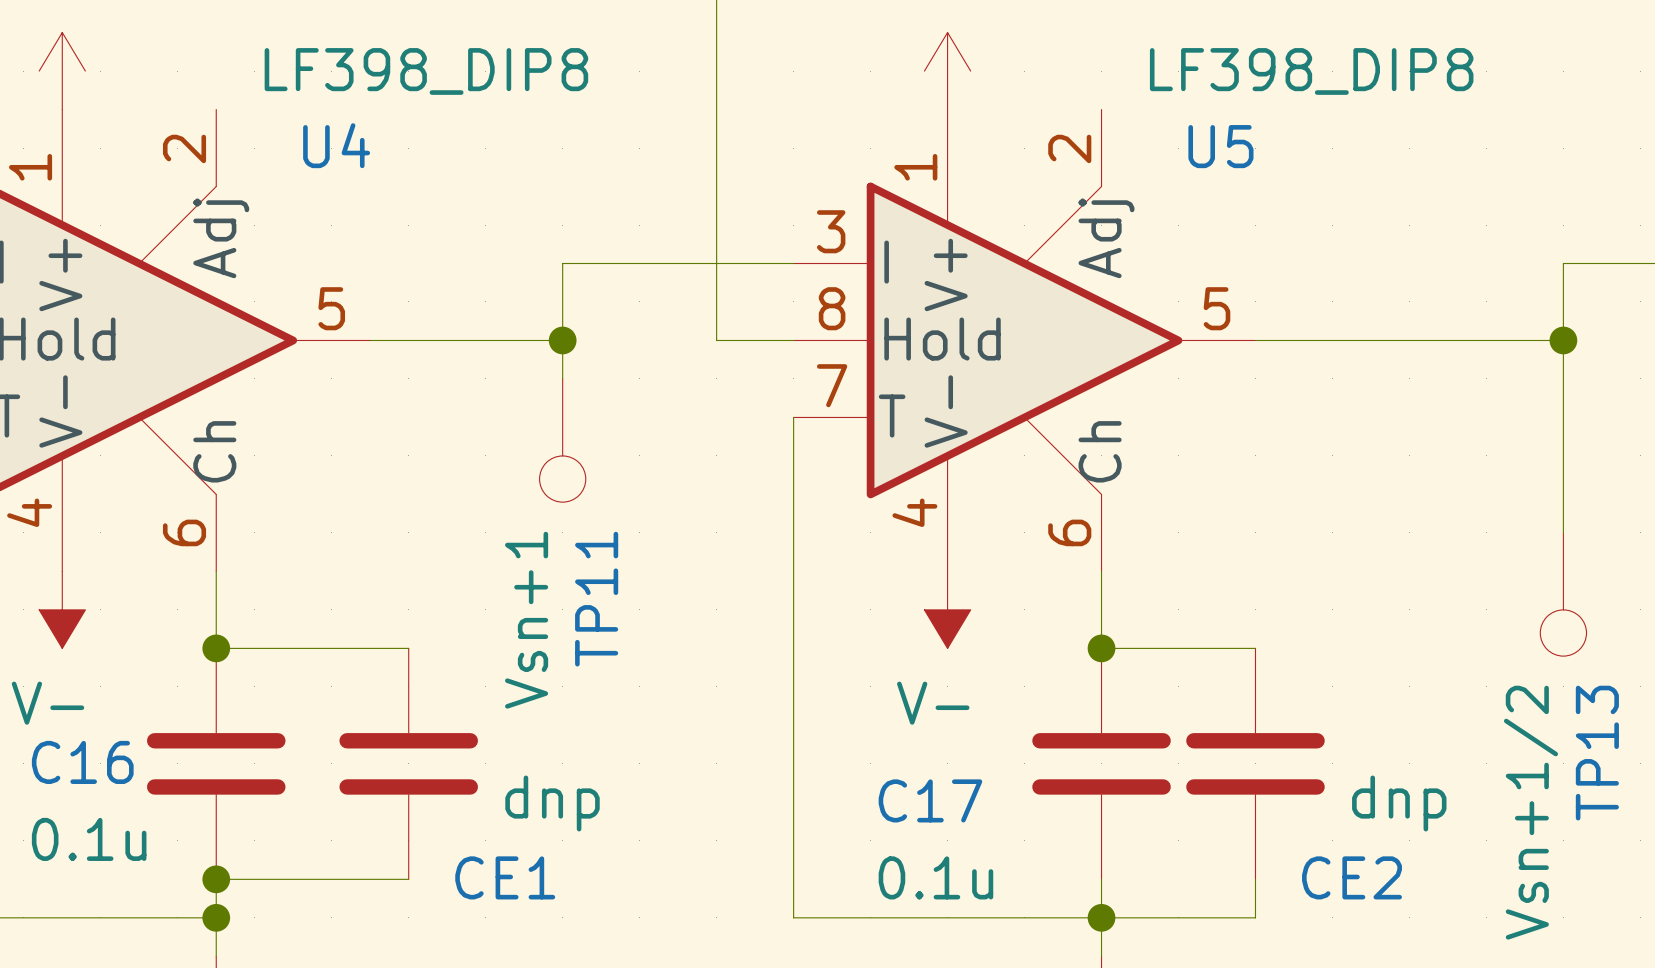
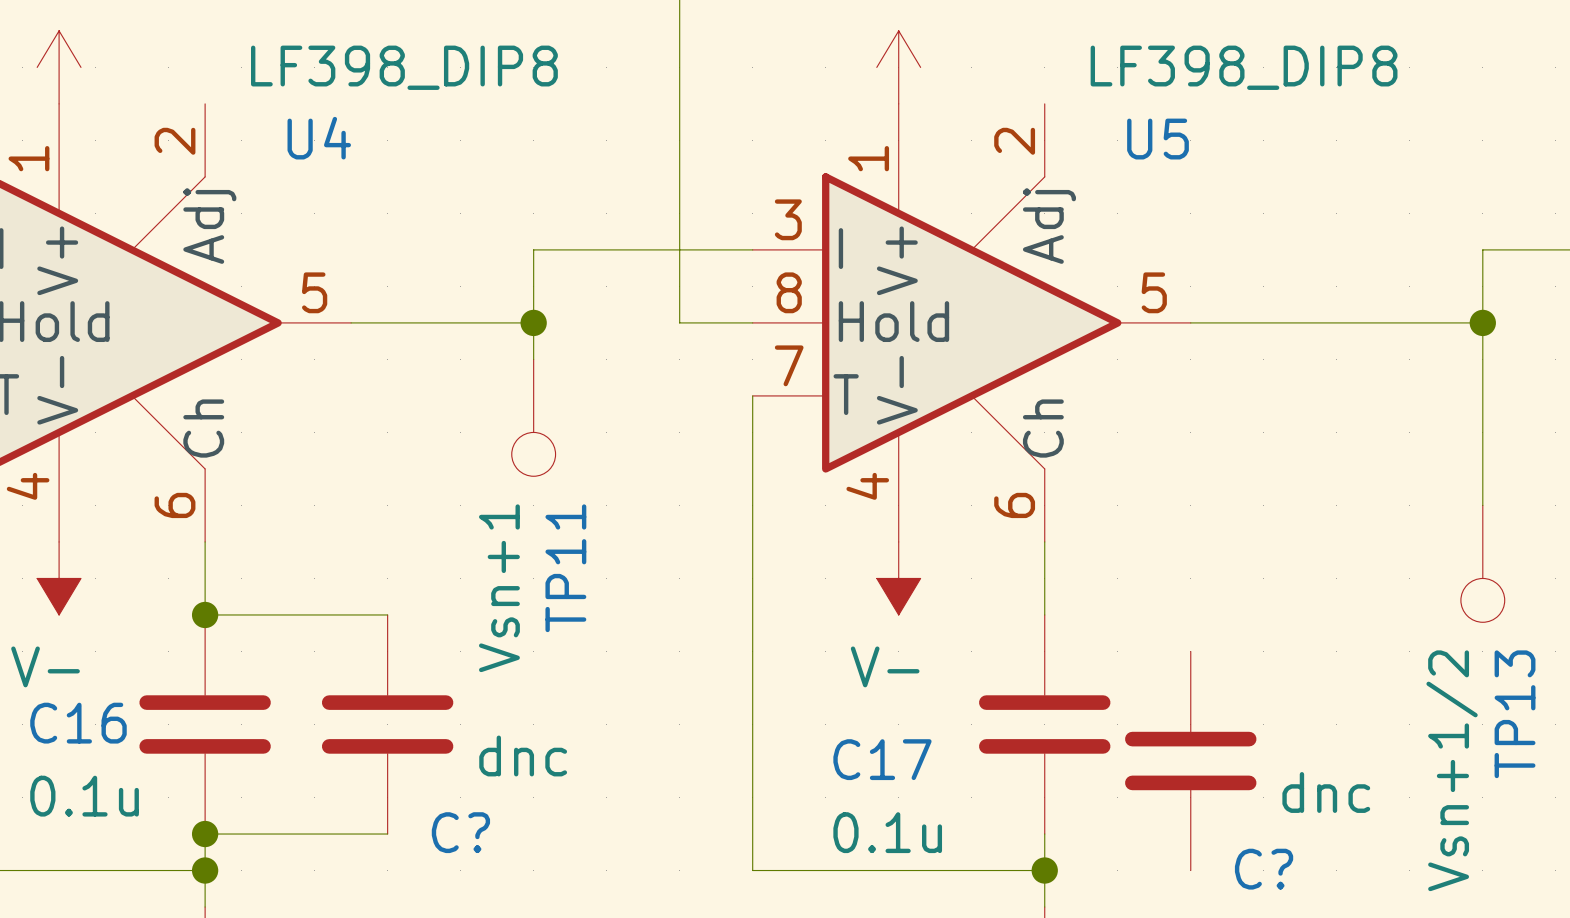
wire: (1101, 648) (1255, 648) -> none
junction: (1101, 648) -> none
CE2: dnp (1255, 763) -> none
C?: none -> dnc (1190, 761)
CE1 value: dnp (552, 803) -> dnc (523, 755)
CE1 name: CE1 (505, 877) -> C? (460, 832)
wire: (1255, 879) (1255, 917) (1101, 917) -> none

